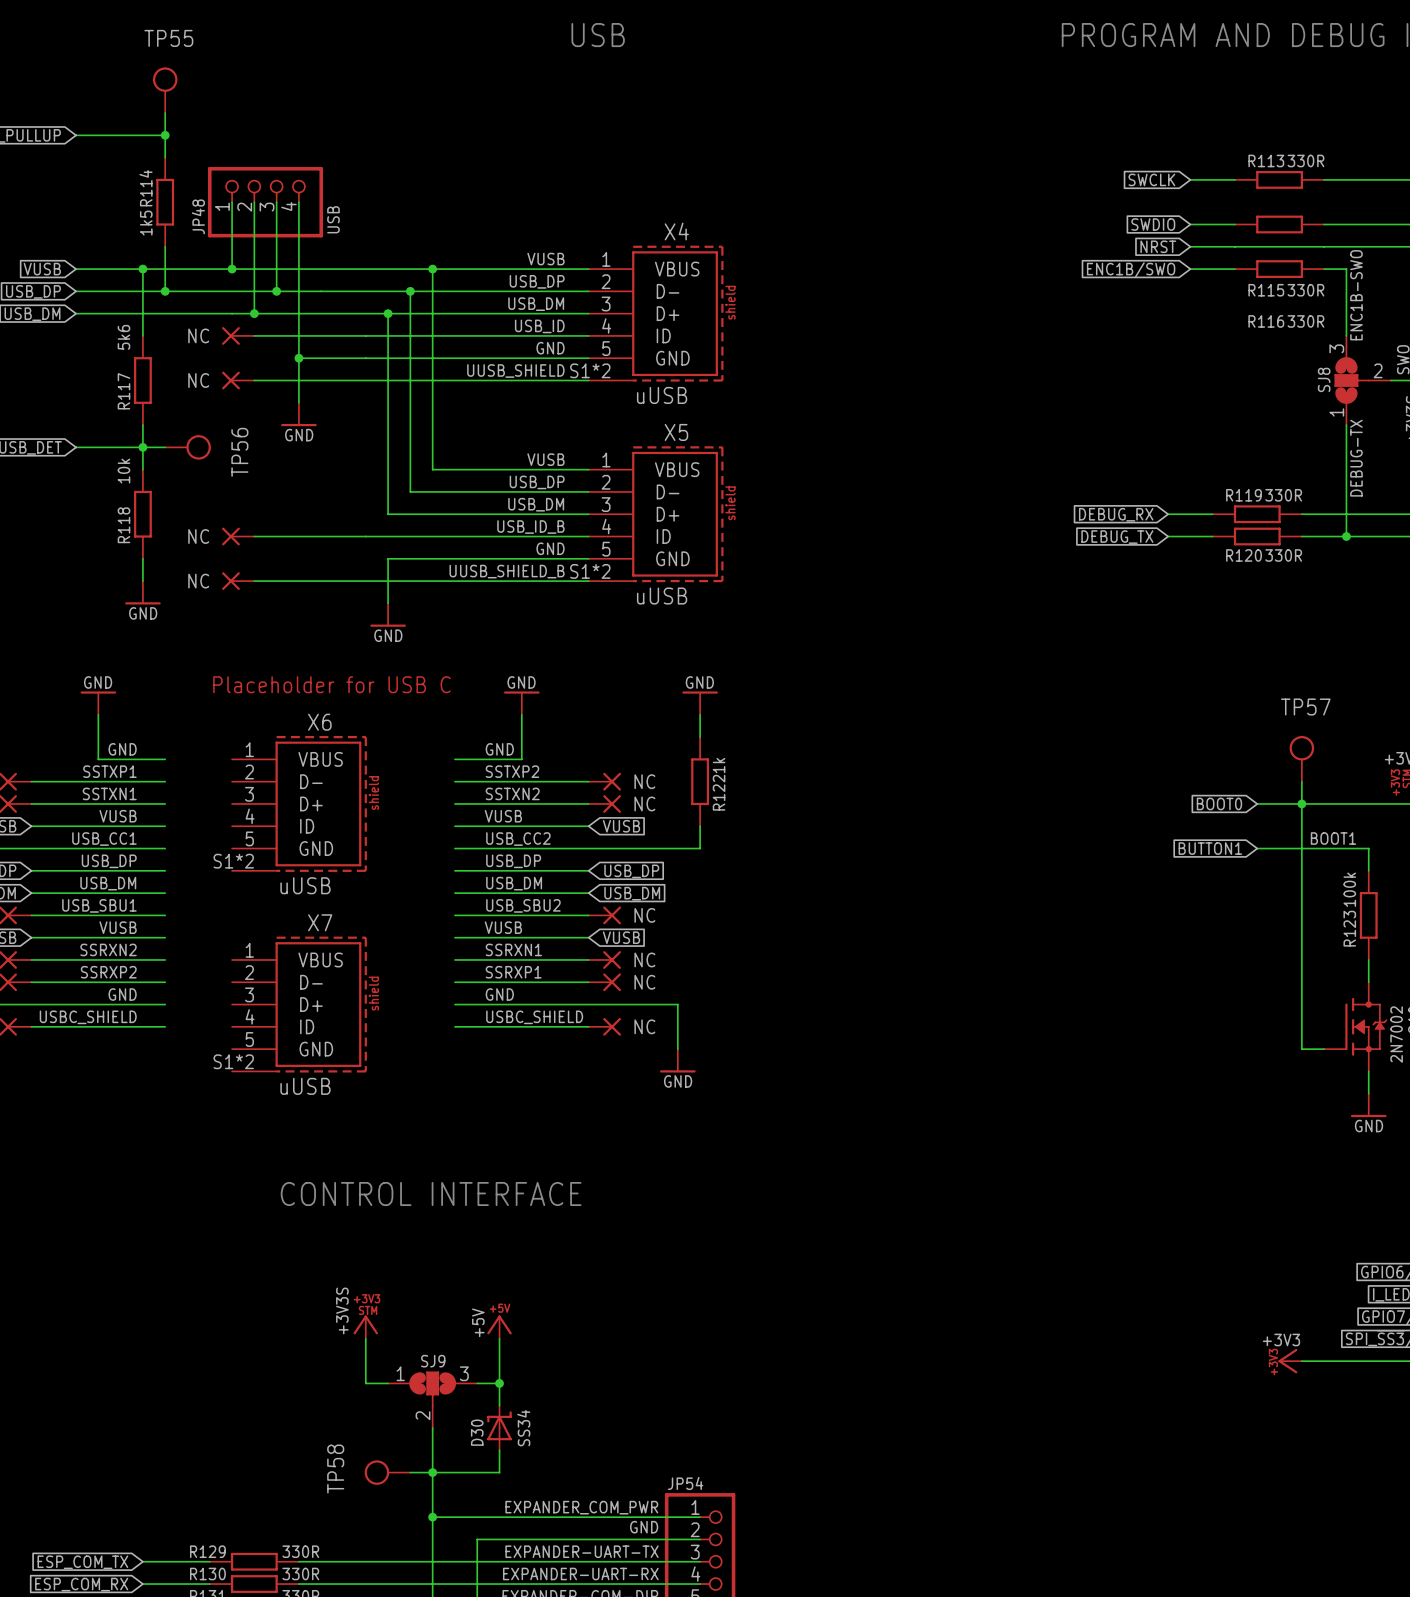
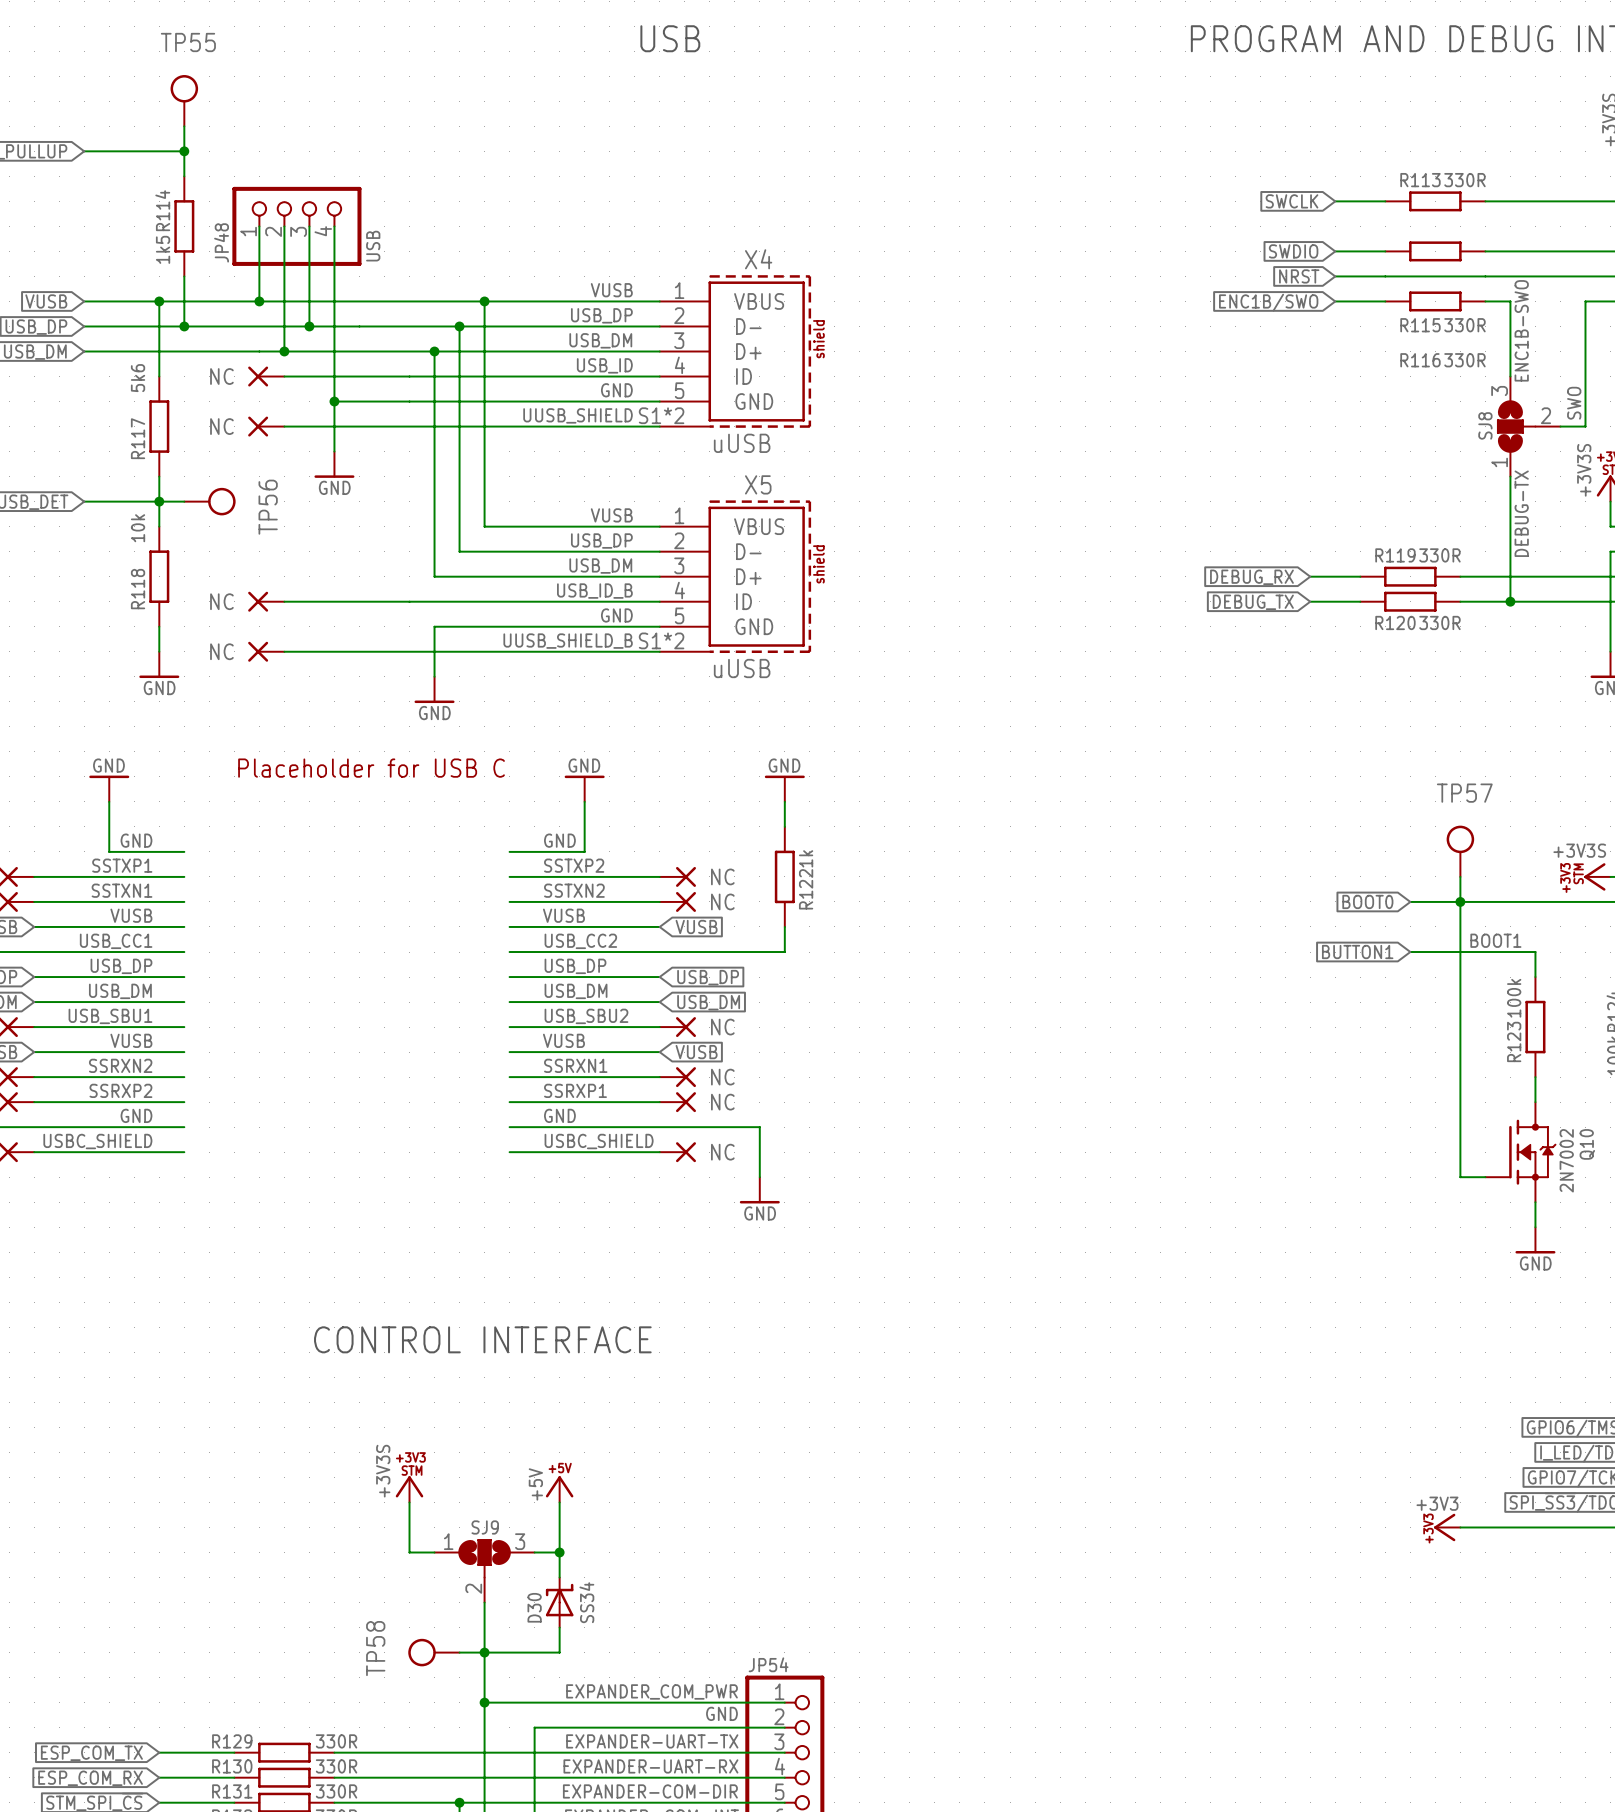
X6: uUSB (299, 803) -> none
X7: uUSB (299, 1004) -> none

